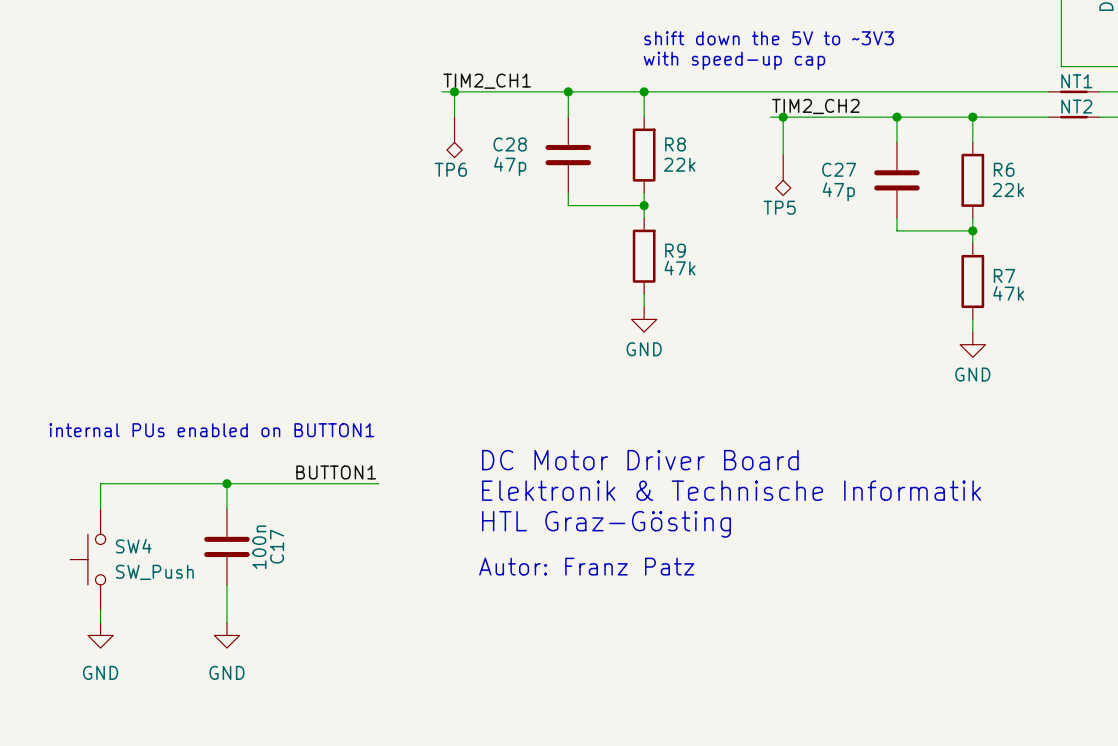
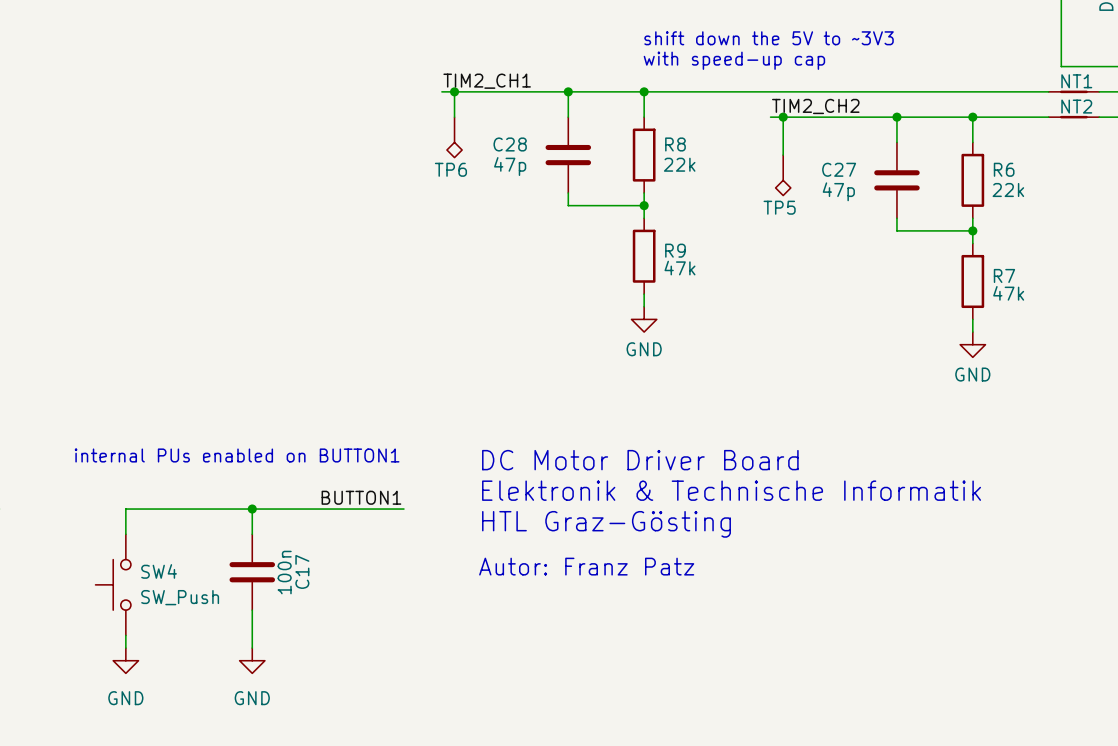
text position: internal PUs enabled on BUTTON1 (211, 430) -> internal PUs enabled on BUTTON1 (237, 455)
label position: BUTTON1 (336, 472) -> BUTTON1 (361, 497)
wire: (226, 483) (226, 509) -> (252, 509) (252, 534)
junction position: (226, 483) -> (252, 509)
wire: (378, 483) (100, 483) (100, 509) -> (403, 509) (125, 509) (125, 534)
C17 position: (226, 546) -> (252, 572)
SW4 position: (87, 559) -> (113, 584)
wire: (226, 584) (226, 622) -> (252, 610) (252, 648)
wire: (100, 610) (100, 622) -> (125, 635) (125, 648)
power symbol position: GND (100, 635) -> GND (125, 660)
power symbol position: GND (226, 635) -> GND (252, 660)

